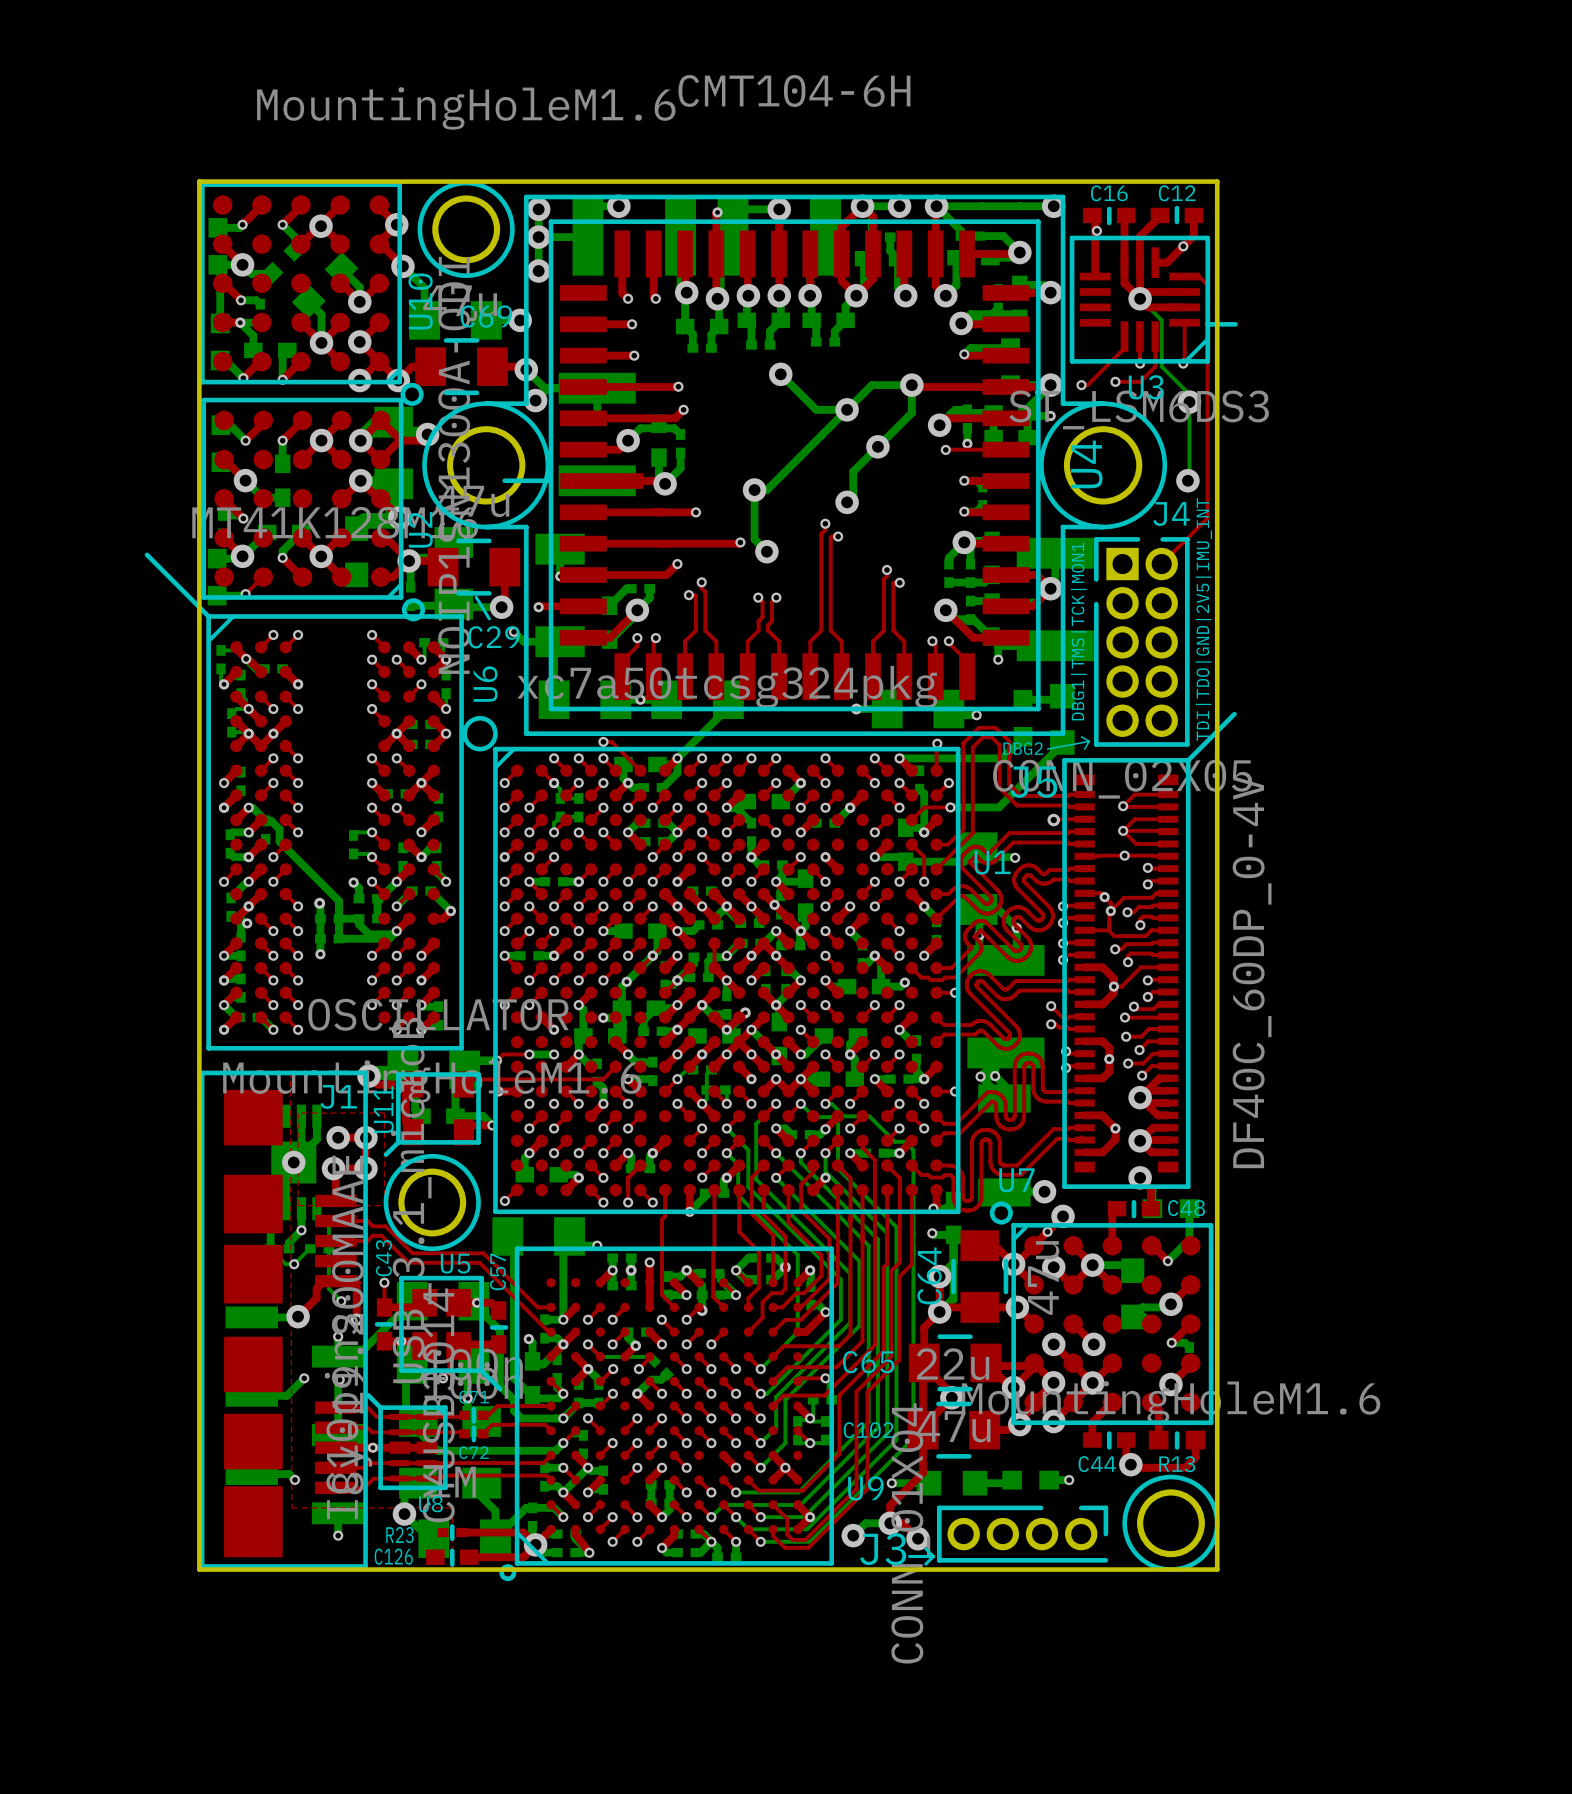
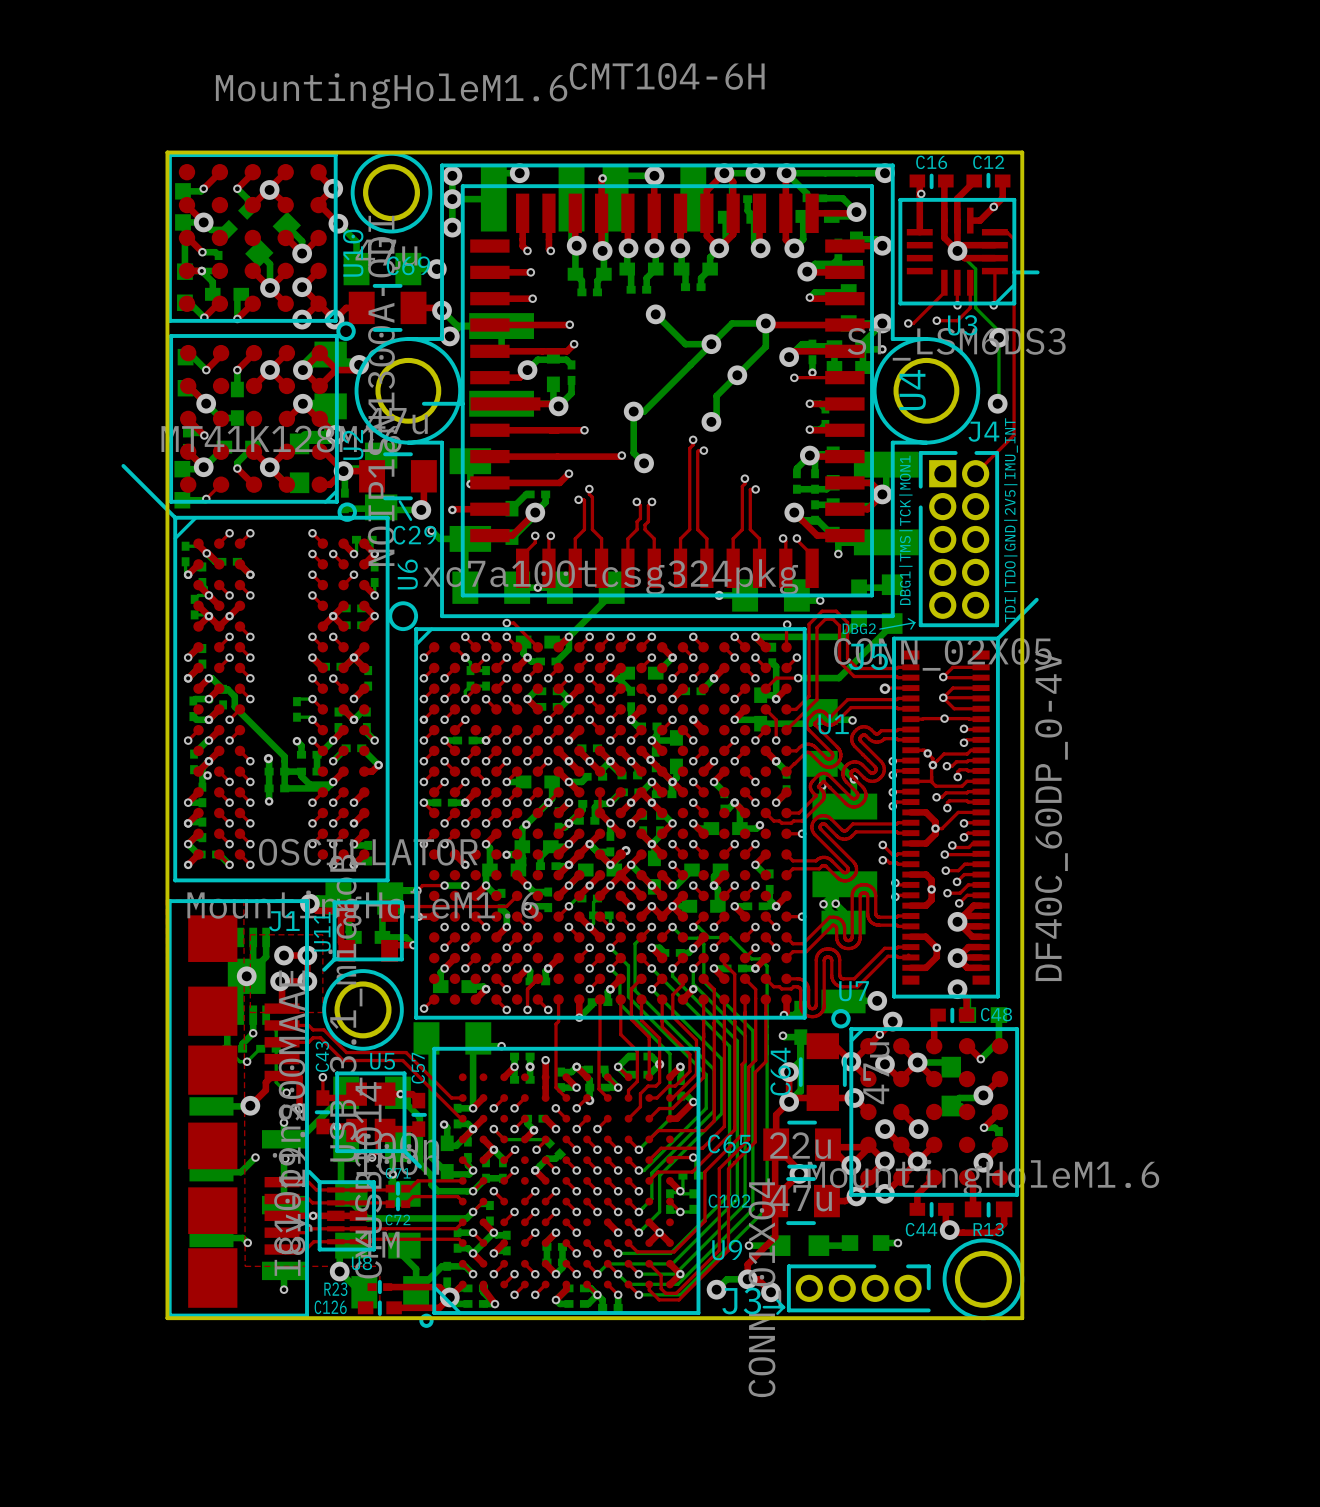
U1 value: xc7a50tcsg324pkg (727, 686) -> xc7a100tcsg324pkg (610, 576)

